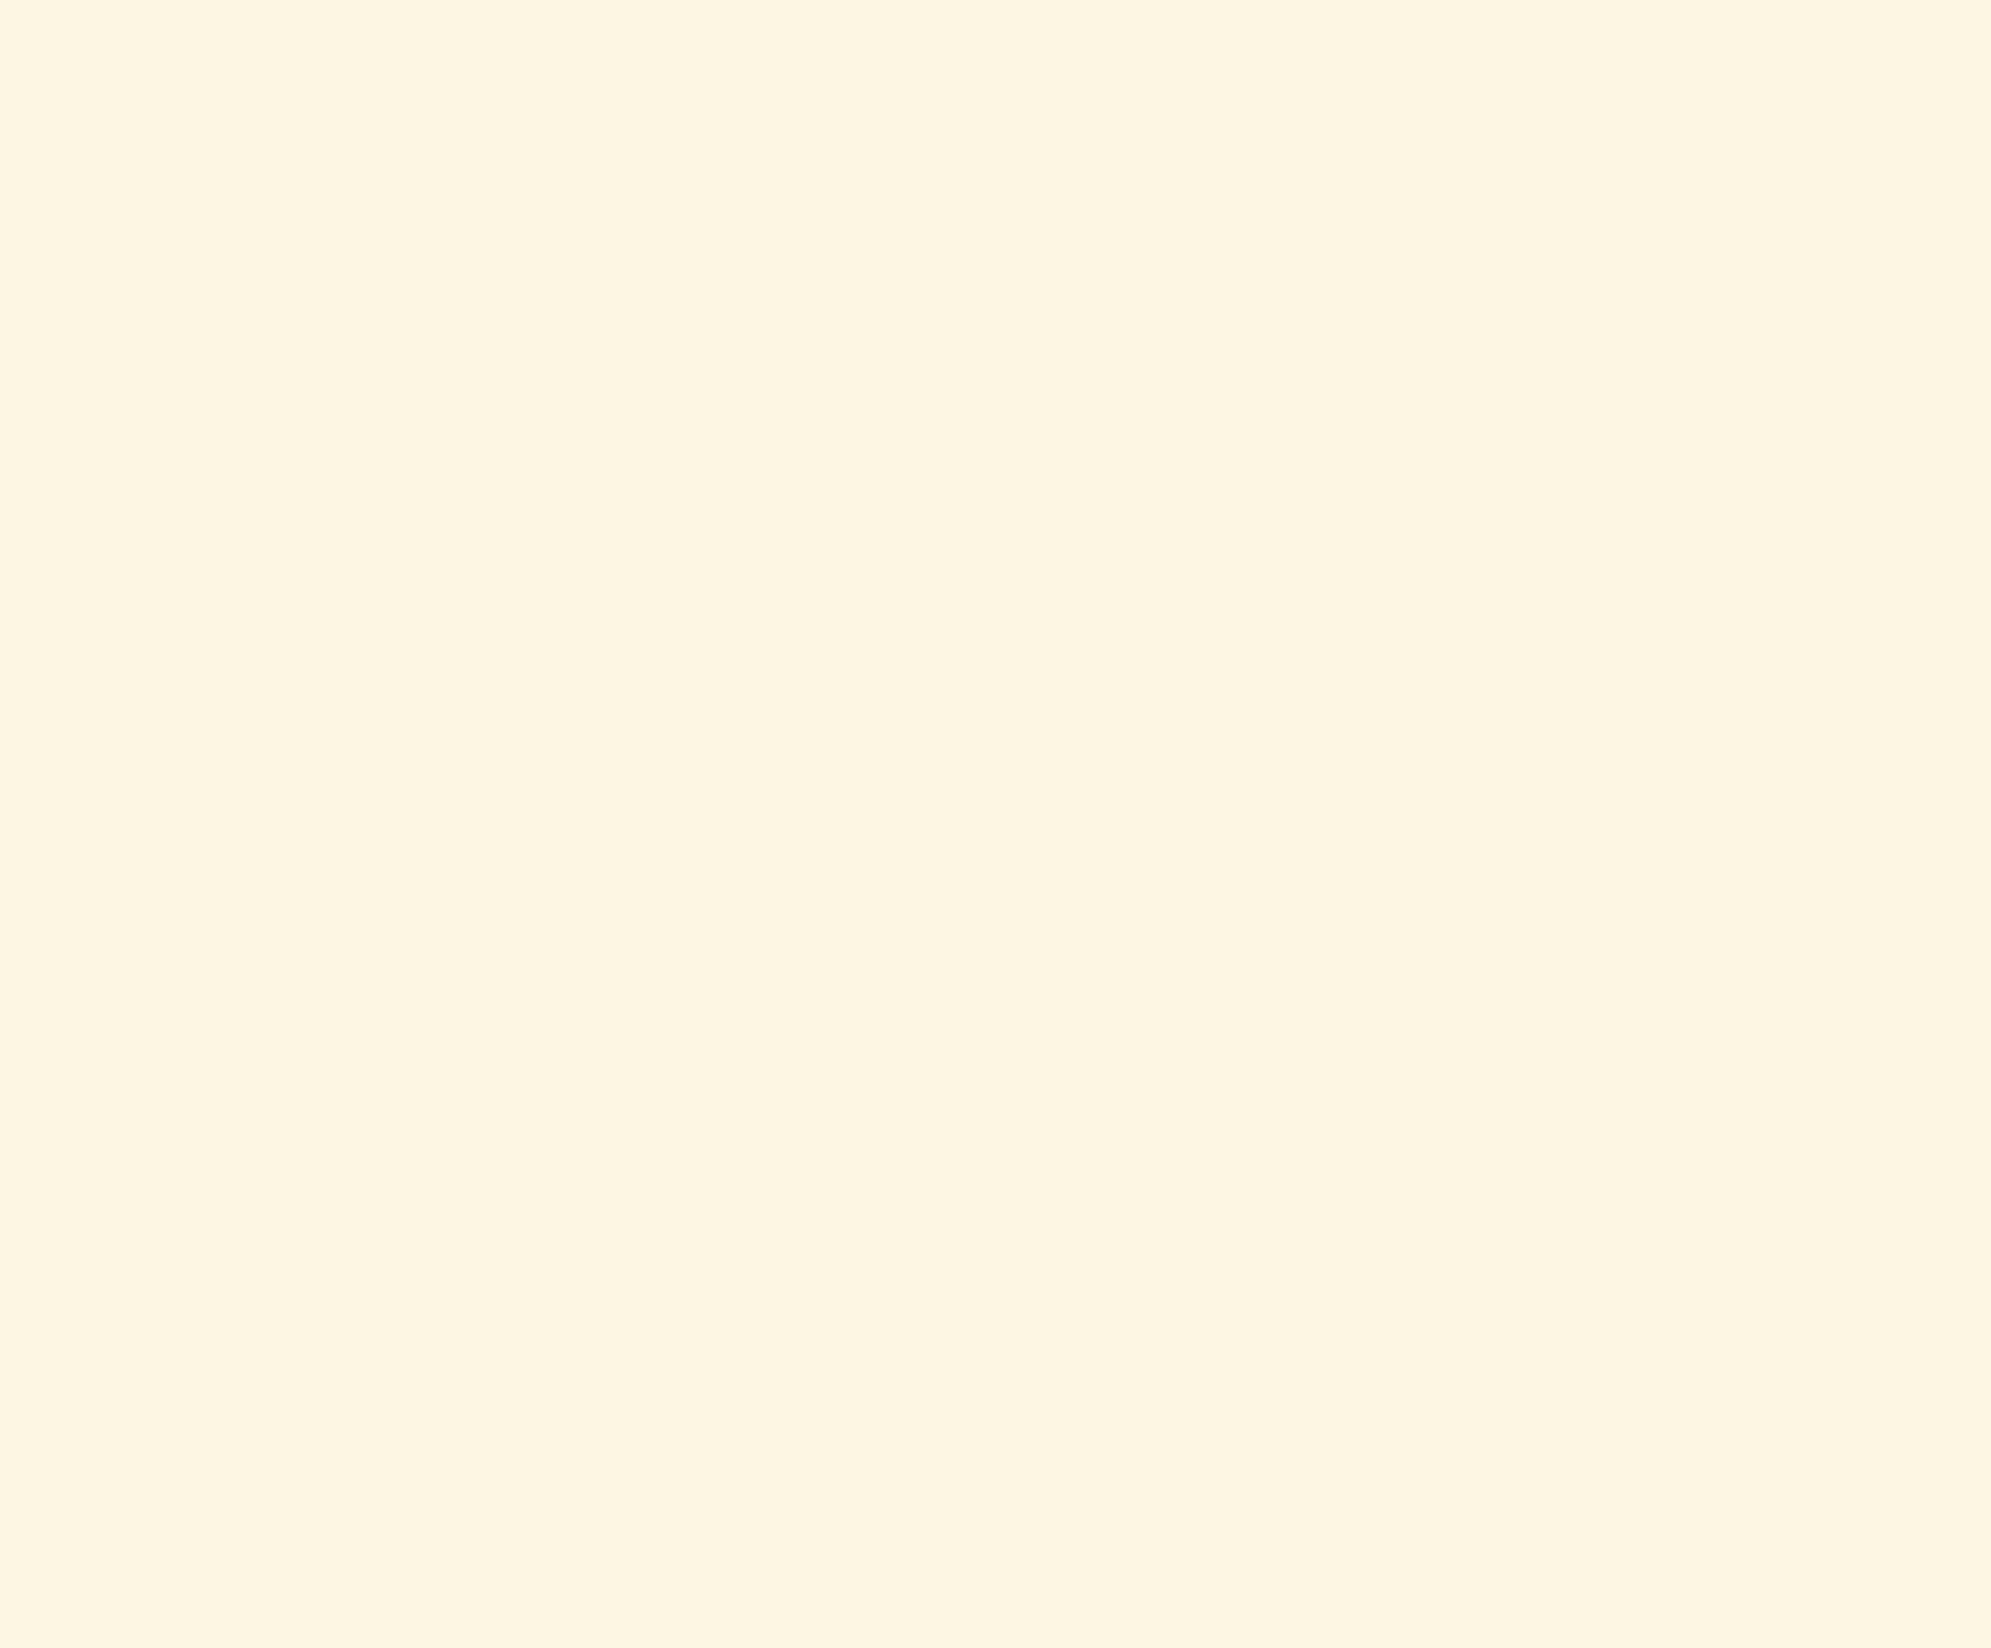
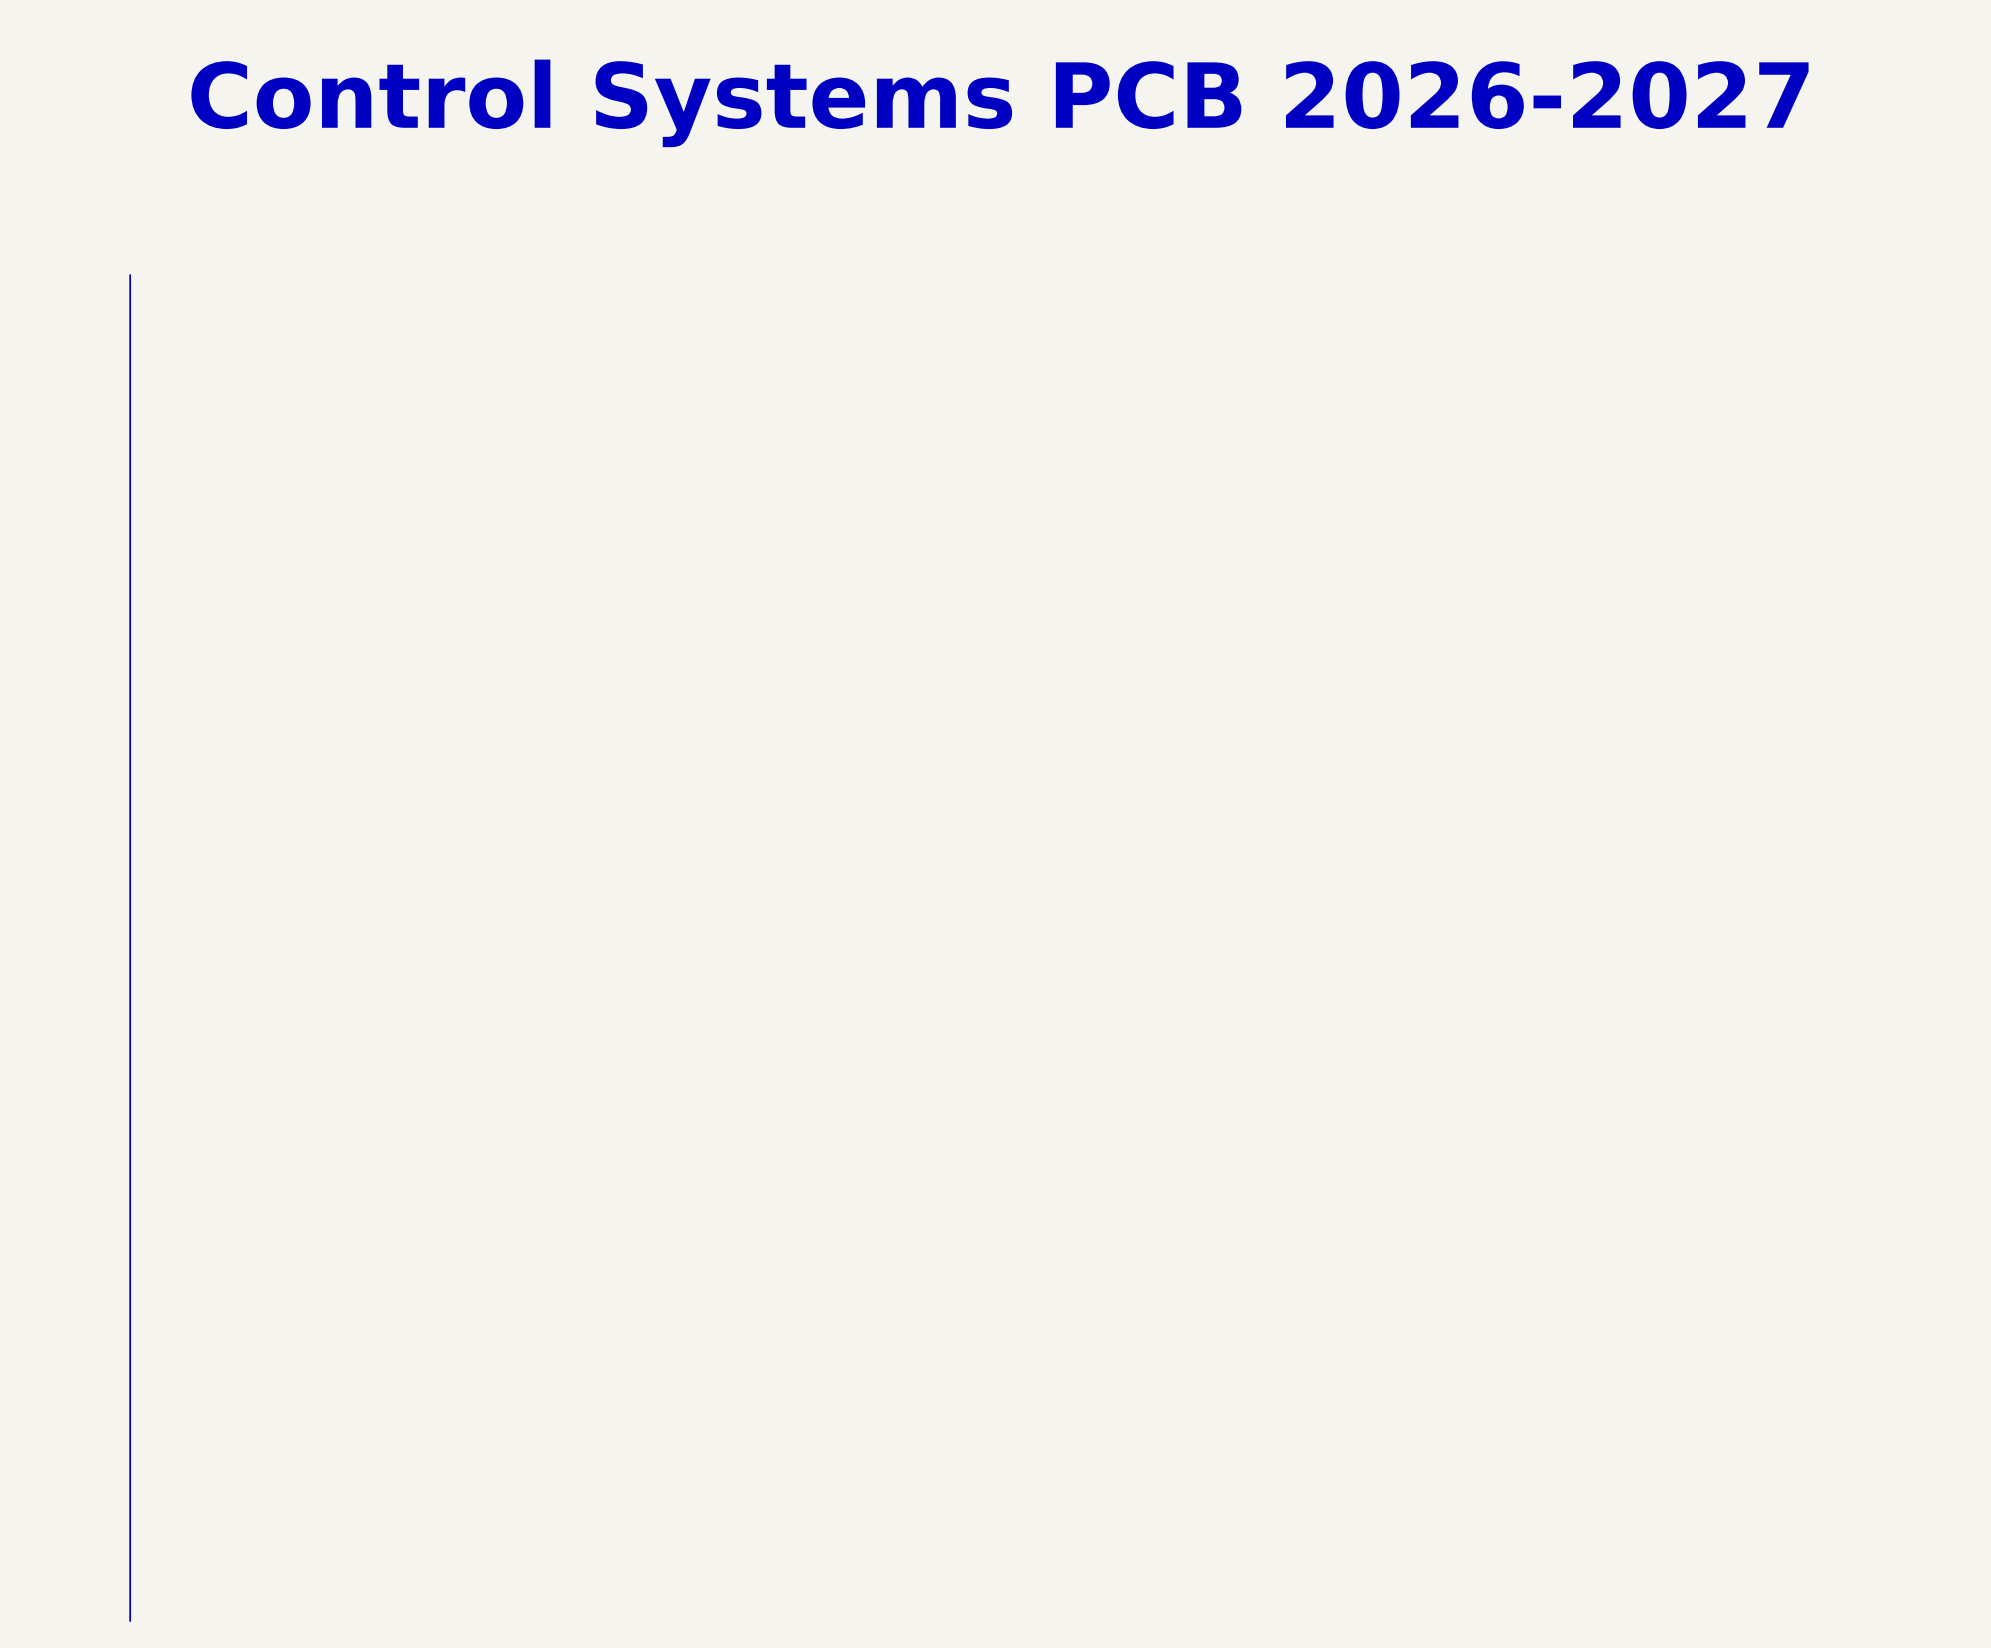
text: none -> Control Systems PCB 2026-2027 (999, 103)
line: none -> (130, 275) (130, 1621)

